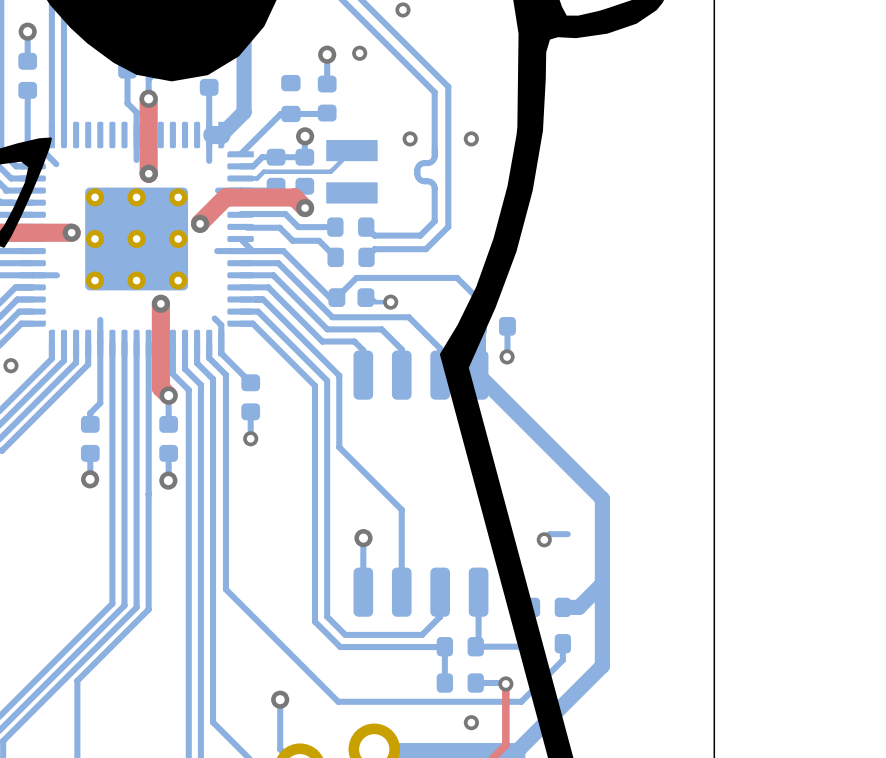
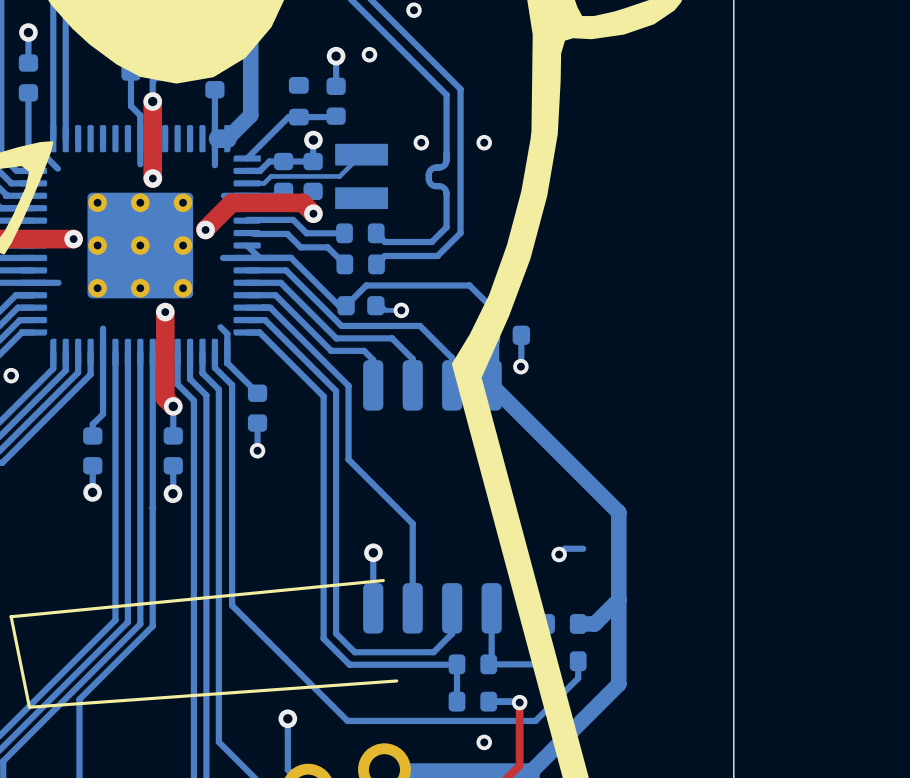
line: none -> (383, 580) (11, 616) (29, 706)
line: none -> (396, 680) (29, 707)

